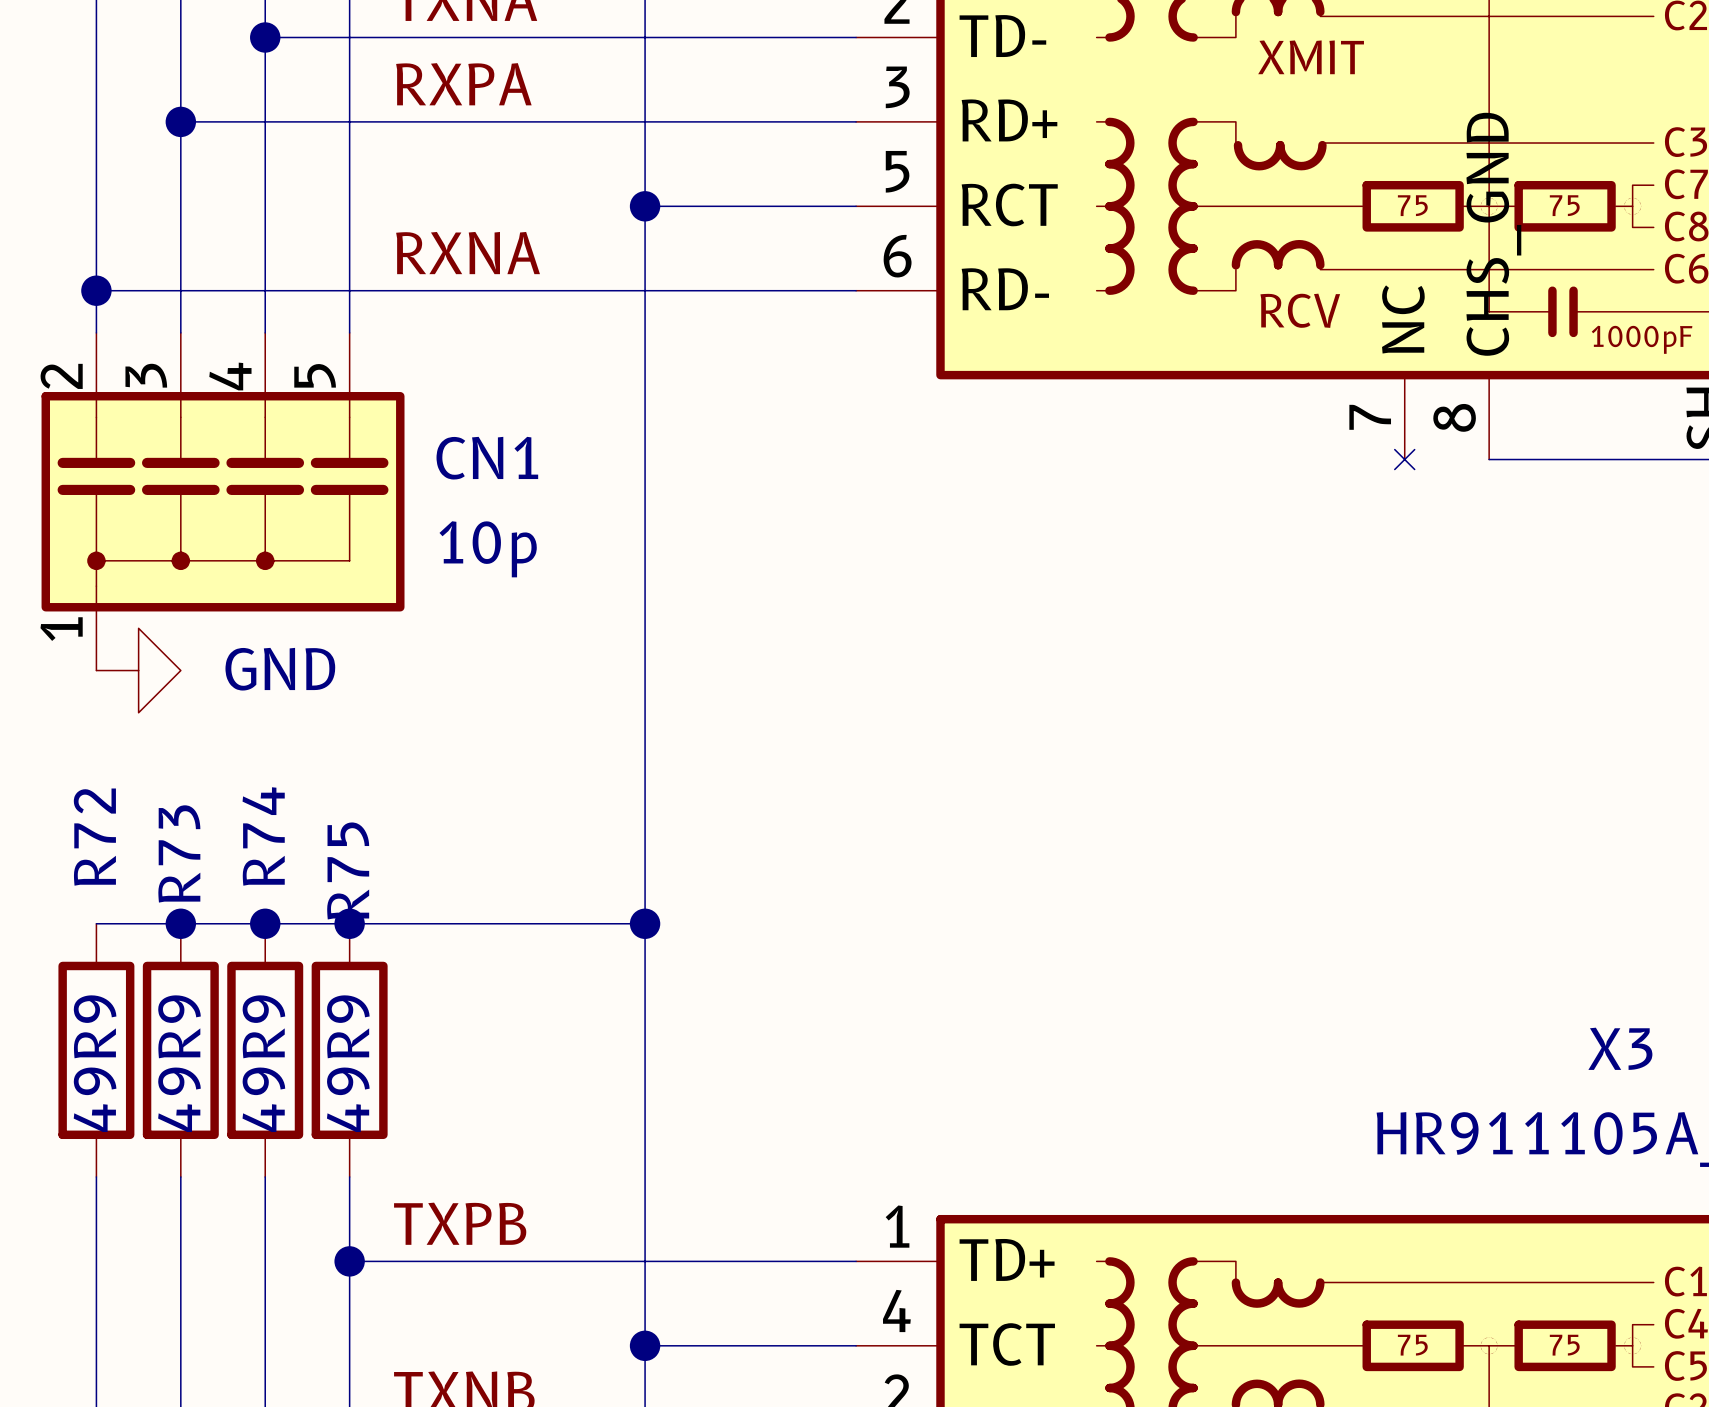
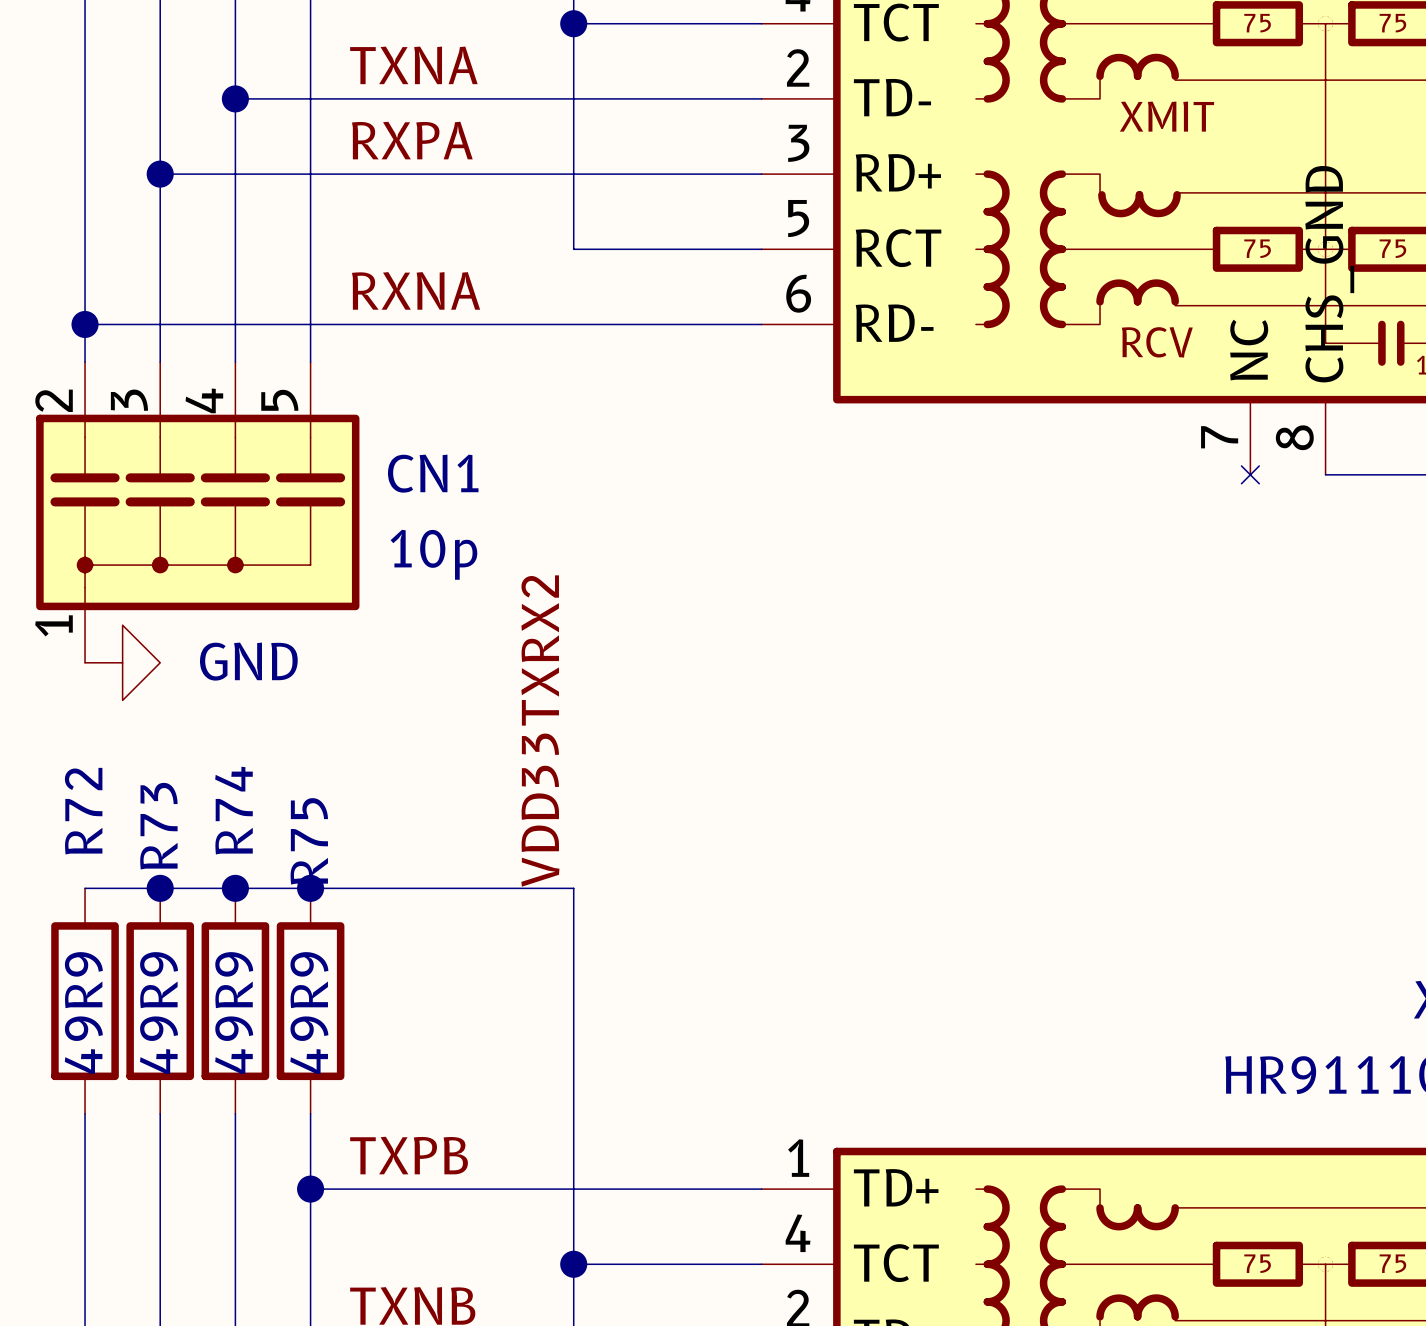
wire: (645, 206) (645, 923) -> none
junction: (645, 206) -> none
label: none -> VDD33TXRX2 (540, 731)
junction: (645, 923) -> none

